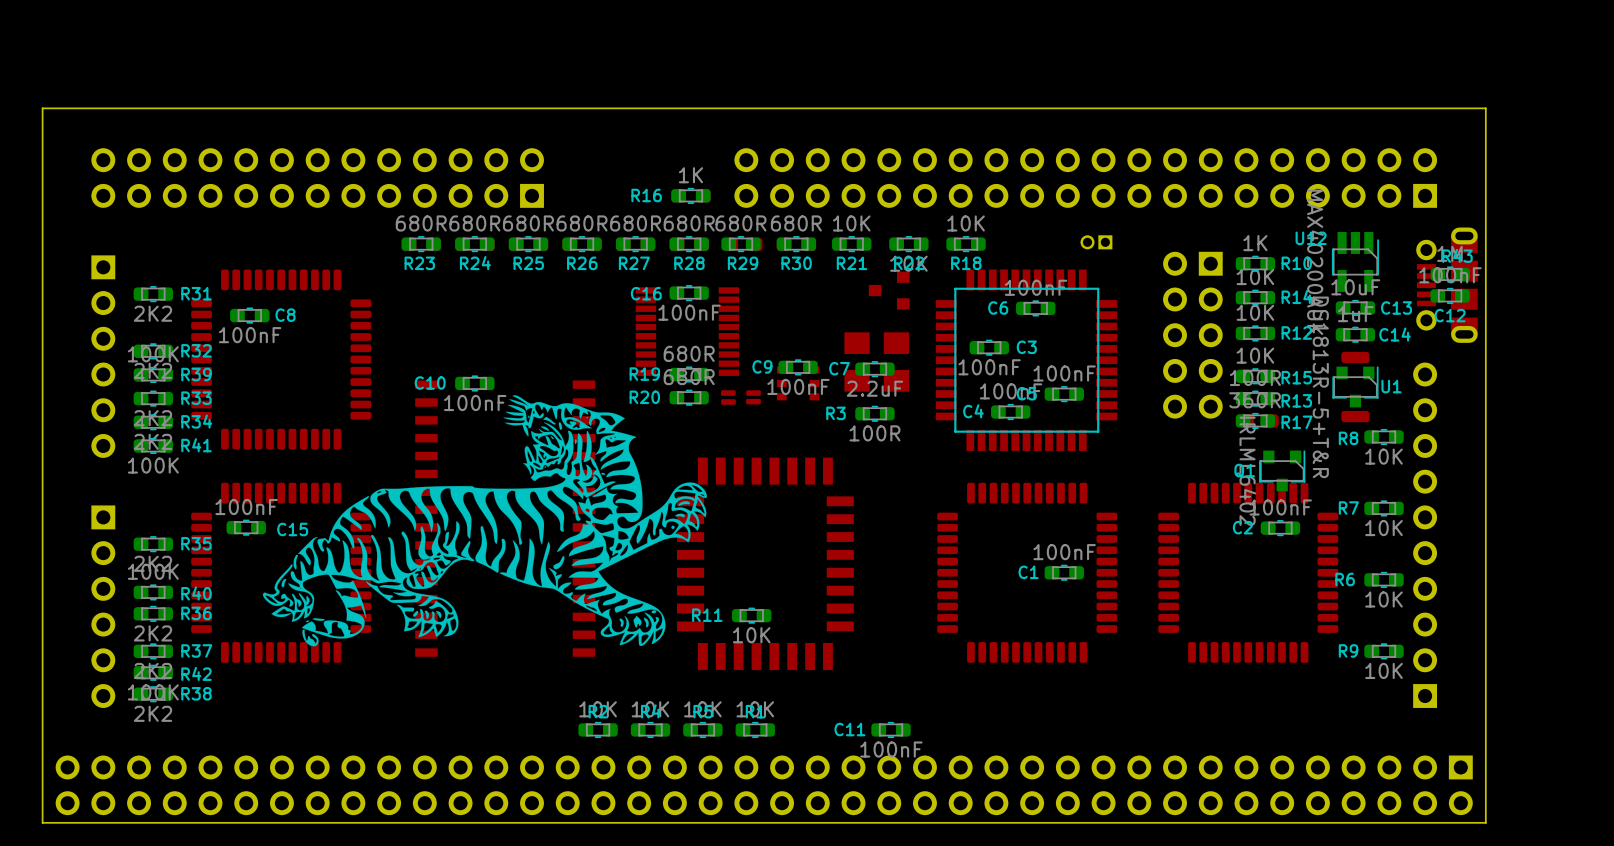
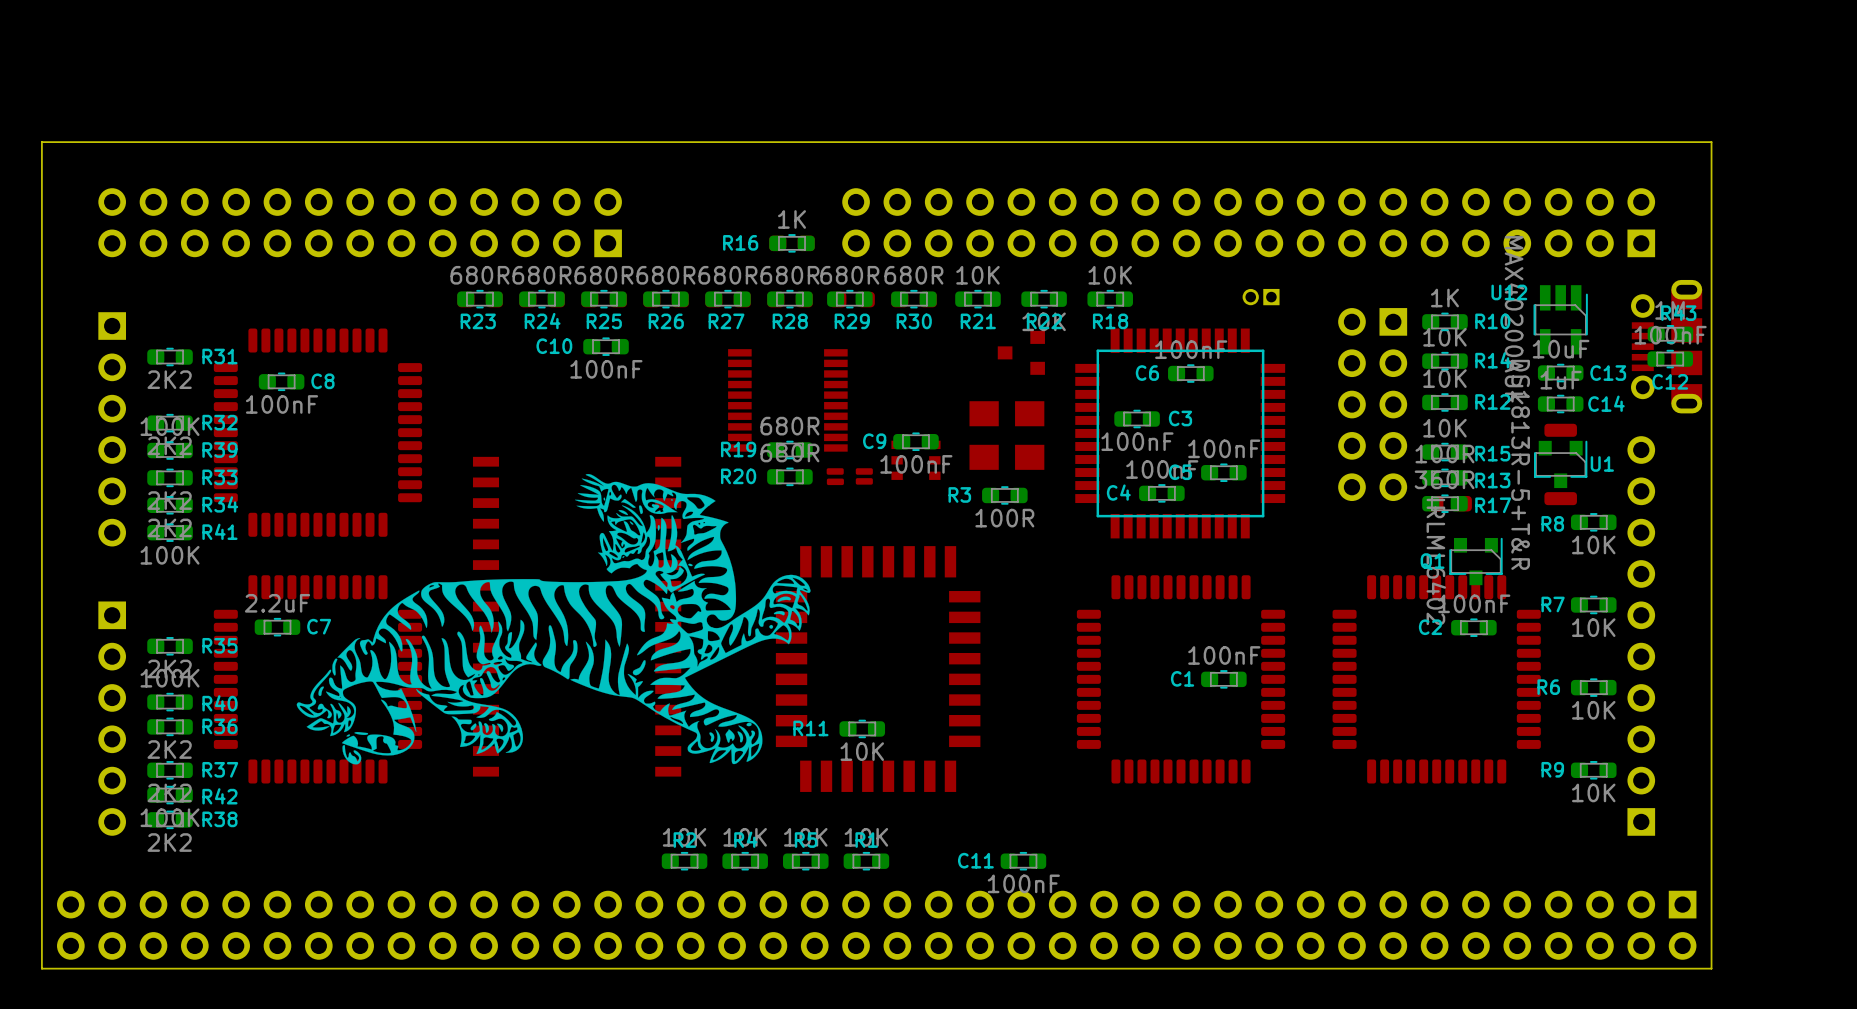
C16: 100nF (689, 293) -> none
C7: 2.2uF (874, 369) -> none
C10 position: (474, 383) -> (606, 346)
C15 value: 100nF (246, 507) -> 2.2uF (277, 603)
C15 name: C15 (292, 529) -> C7 (319, 626)

